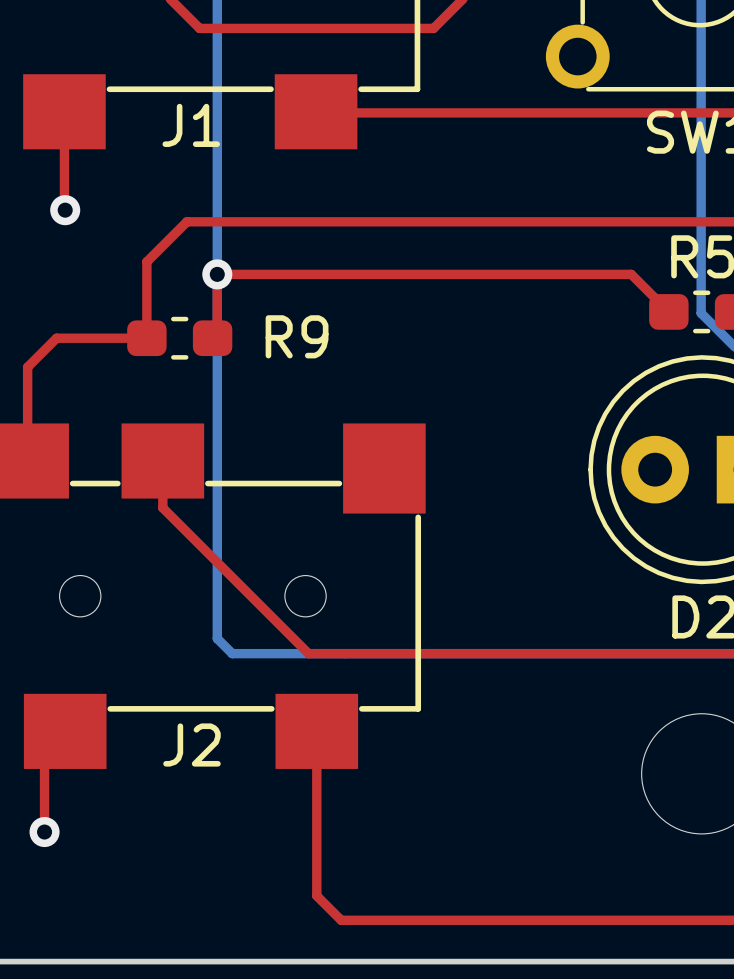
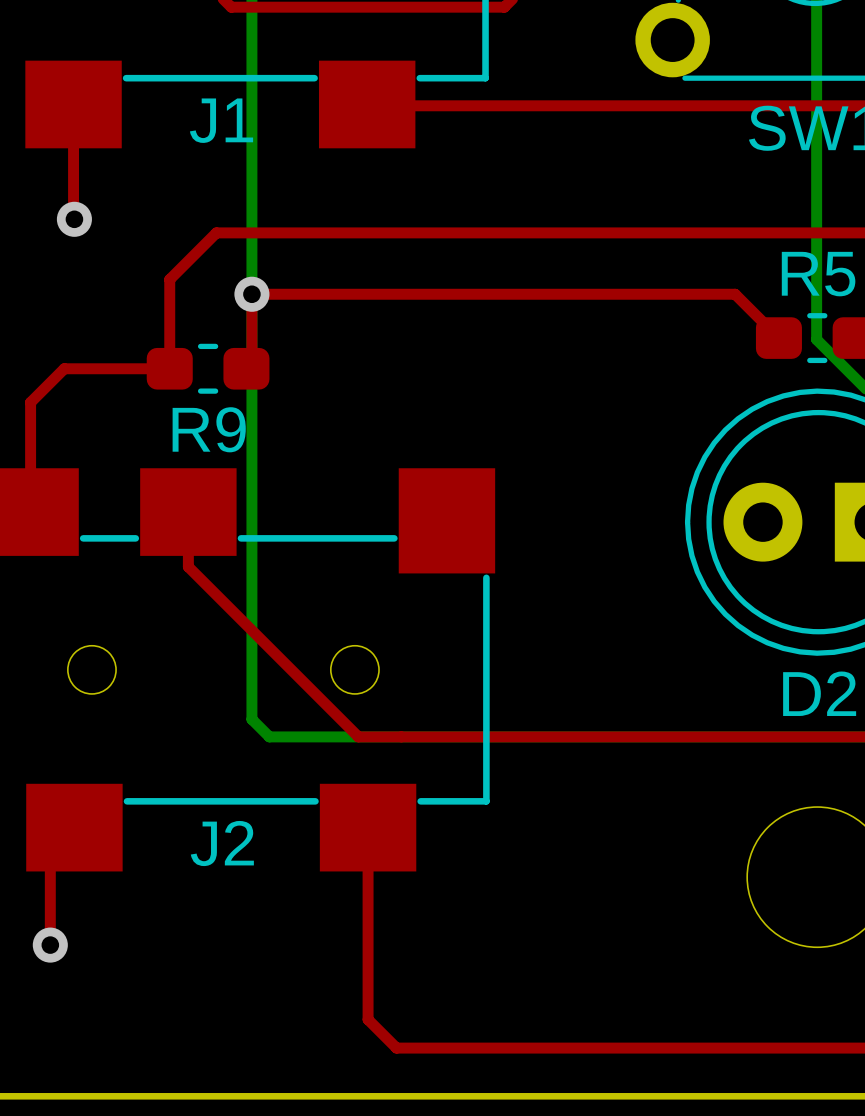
R9 name position: R9 (297, 336) -> R9 (209, 429)

